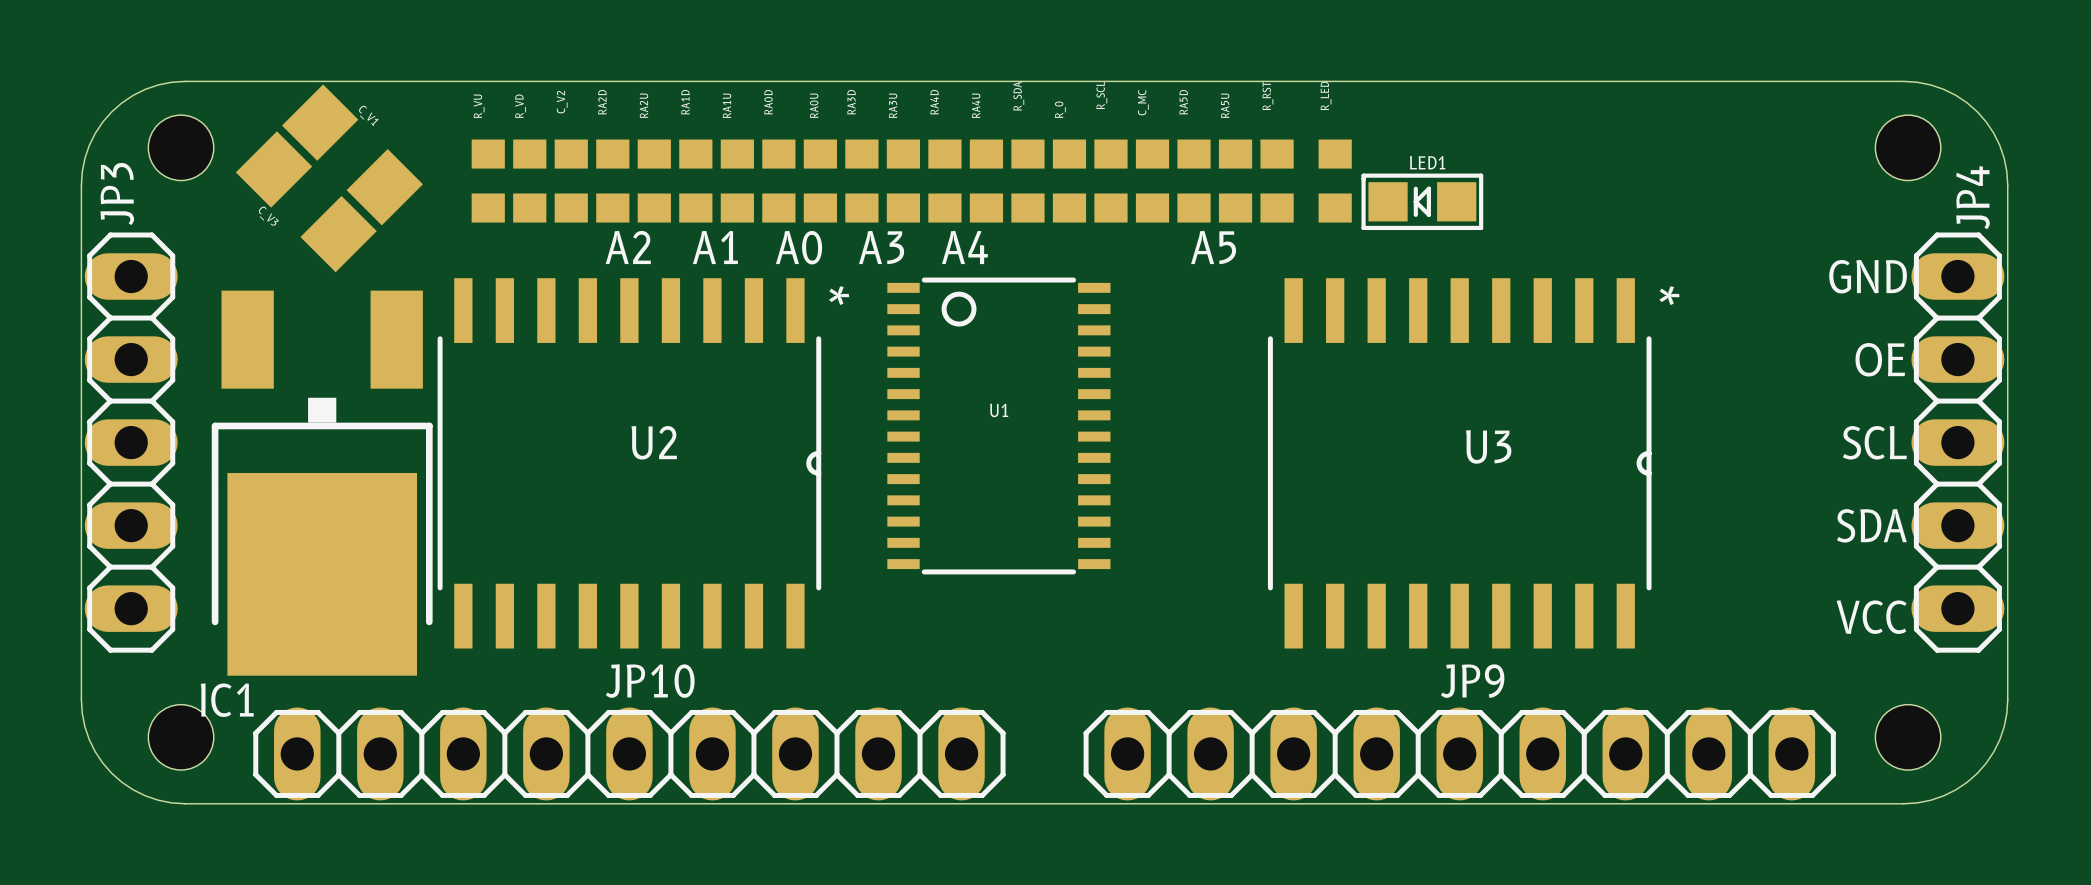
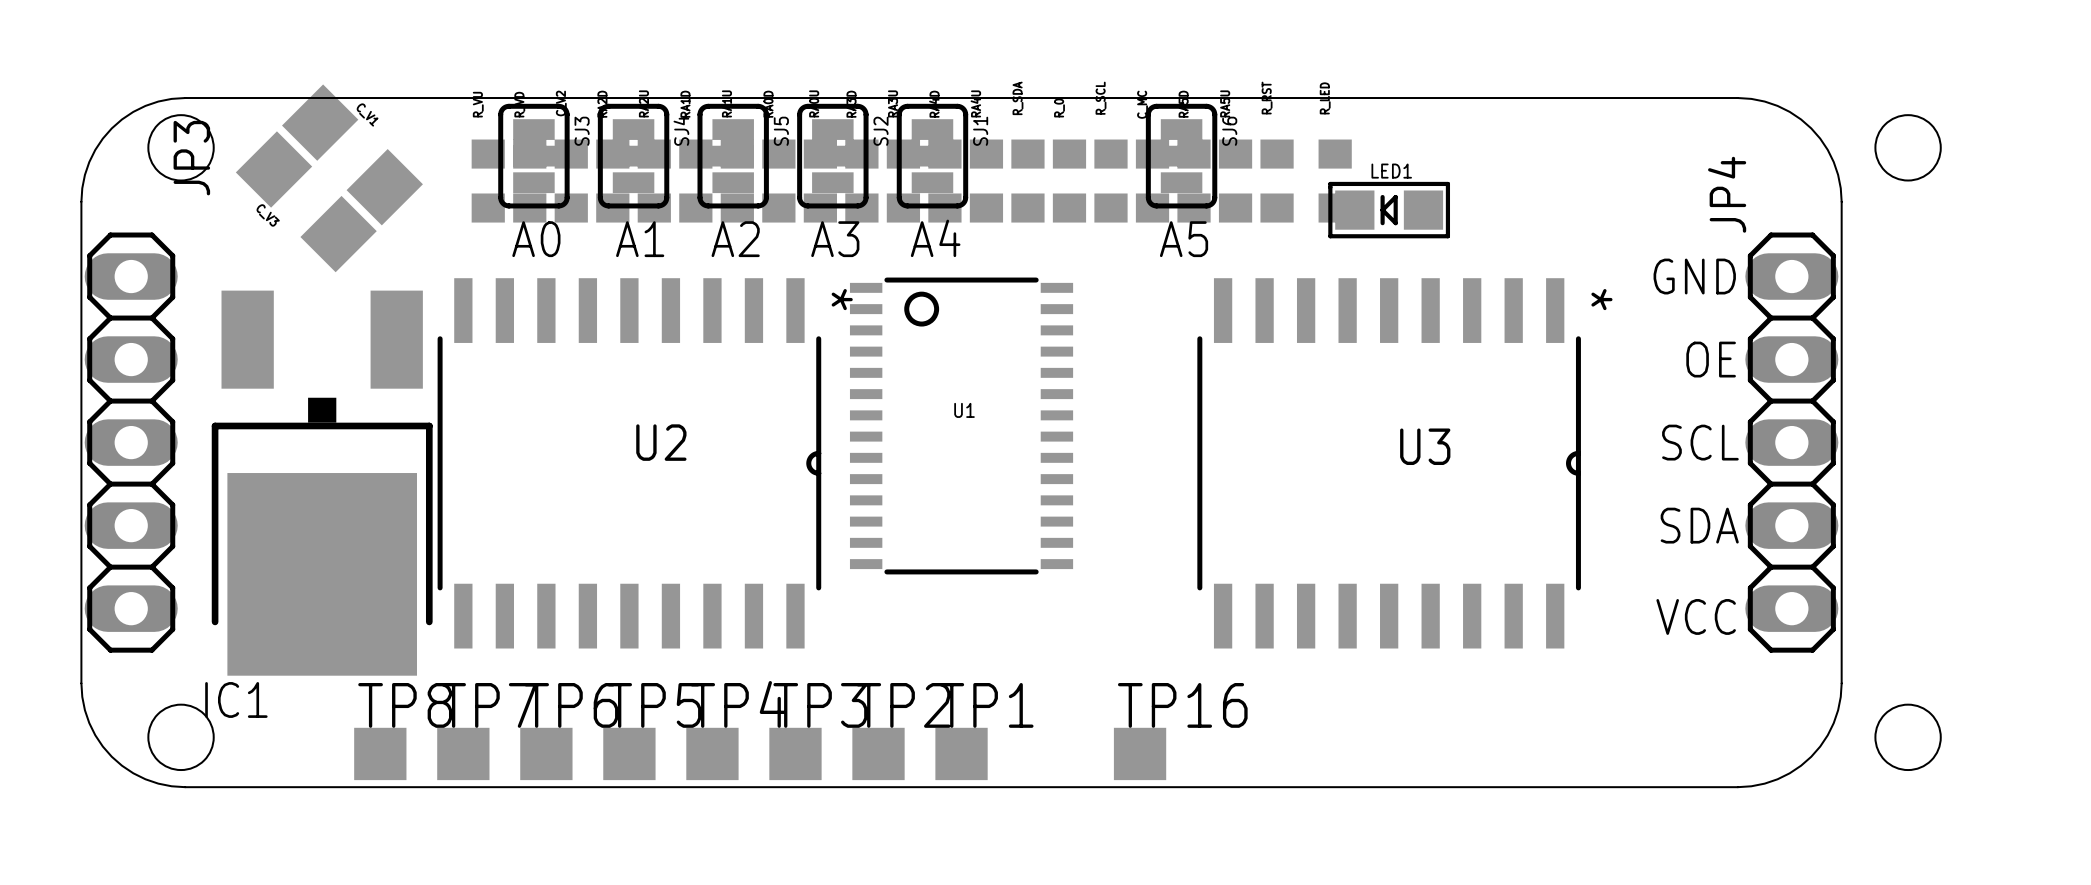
SJ3: none -> (533, 156)
SJ4: none -> (633, 156)
SJ5: none -> (733, 156)
SJ2: none -> (832, 156)
SJ1: none -> (932, 156)
SJ6: none -> (1181, 156)
JP3 name position: JP3 (117, 193) -> JP3 (191, 158)
JP4 name position: JP4 (1973, 197) -> JP4 (1727, 194)
board edge: (81, 201) (82, 171) (84, 158) (95, 133) (102, 122) (122, 102) (145, 89) (158, 84) (185, 81) (1903, 81) (1930, 84) (1943, 89) (1955, 95) (1977, 111) (1993, 133) (1999, 145) (2004, 158) (2007, 185) (2006, 713) (1999, 739) (1993, 751) (1977, 773) (1955, 789) (1930, 800) (1903, 803) (185, 803) (158, 800) (145, 795) (122, 782) (102, 763) (95, 751) (84, 726) (82, 713) (81, 683) -> (81, 201) (84, 174) (89, 162) (95, 149) (111, 128) (133, 111) (145, 105) (158, 101) (185, 98) (1737, 98) (1764, 101) (1777, 105) (1789, 111) (1811, 128) (1827, 149) (1833, 162) (1838, 174) (1841, 201) (1840, 696) (1833, 723) (1827, 735) (1811, 756) (1789, 773) (1764, 783) (1737, 787) (185, 787) (158, 783) (145, 779) (133, 773) (111, 756) (95, 735) (89, 723) (84, 710) (81, 683)
LED1 position: (1422, 201) -> (1389, 210)
text position: A2 (628, 247) -> A2 (735, 239)
text position: A1 (715, 247) -> A1 (640, 239)
text position: A0 (799, 247) -> A0 (536, 239)
text position: A3 (881, 247) -> A3 (835, 239)
text position: A4 (964, 247) -> A4 (935, 238)
text position: A5 (1213, 247) -> A5 (1184, 239)
text position: GND (1868, 276) -> GND (1694, 276)
text position: OE (1880, 359) -> OE (1711, 359)
U1 position: (998, 425) -> (961, 425)
text position: SCL (1874, 442) -> SCL (1700, 442)
JP4 position: (1957, 442) -> (1791, 442)
U3 position: (1459, 463) -> (1389, 463)
text position: SDA (1871, 525) -> SDA (1699, 525)
text position: VCC (1871, 617) -> VCC (1696, 616)
TP8: none -> (380, 753)
TP7: none -> (463, 753)
TP6: none -> (546, 753)
JP10: (629, 753) -> none
TP5: none -> (629, 753)
TP4: none -> (712, 753)
TP3: none -> (795, 753)
TP2: none -> (878, 753)
TP1: none -> (961, 753)
TP16: none -> (1140, 753)
JP9: (1459, 753) -> none

